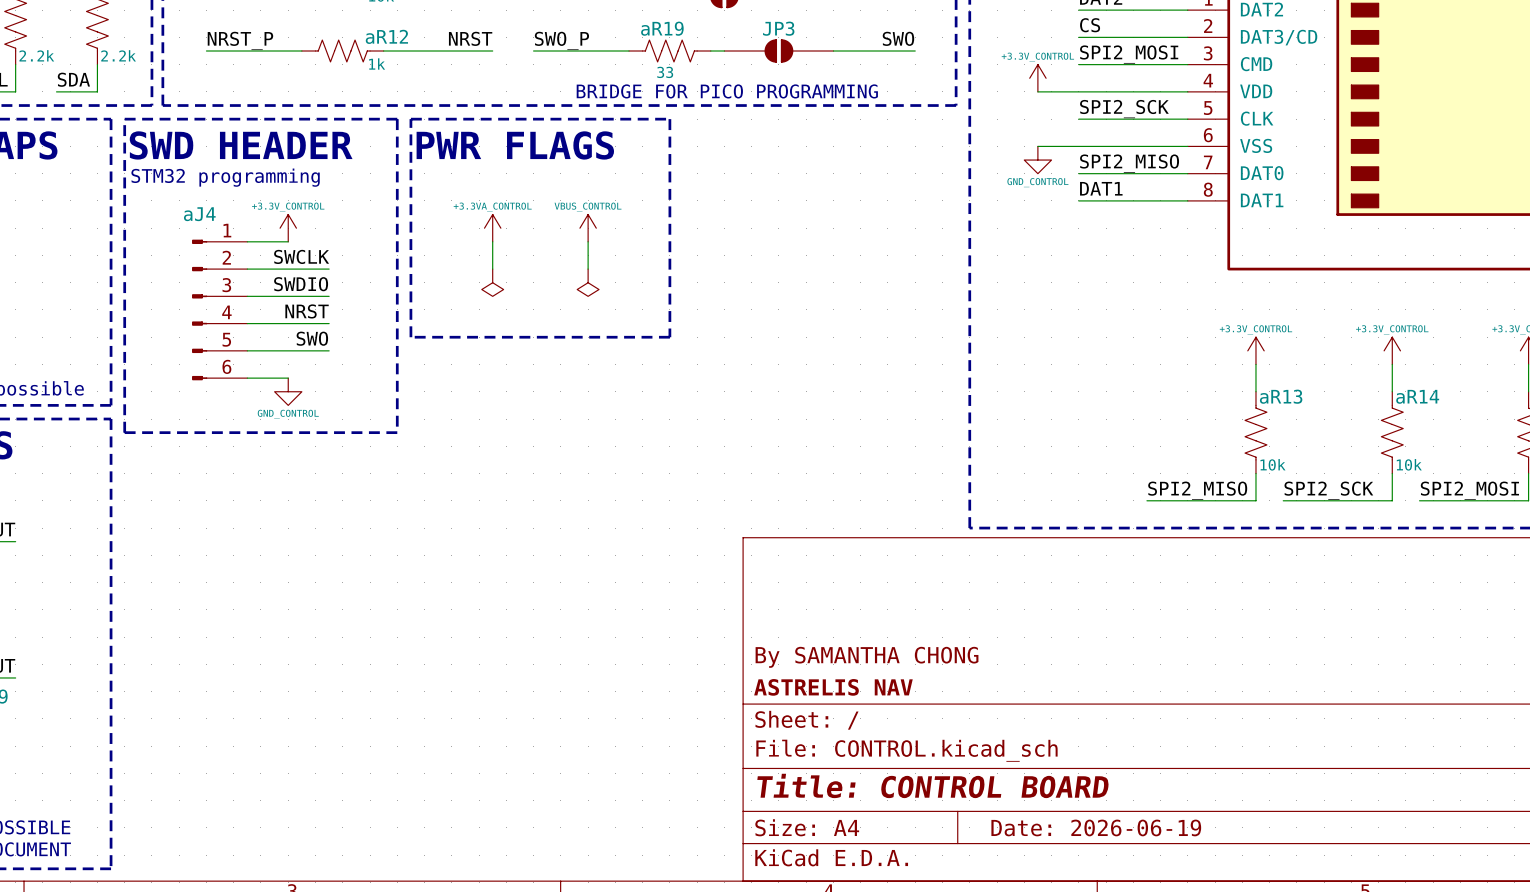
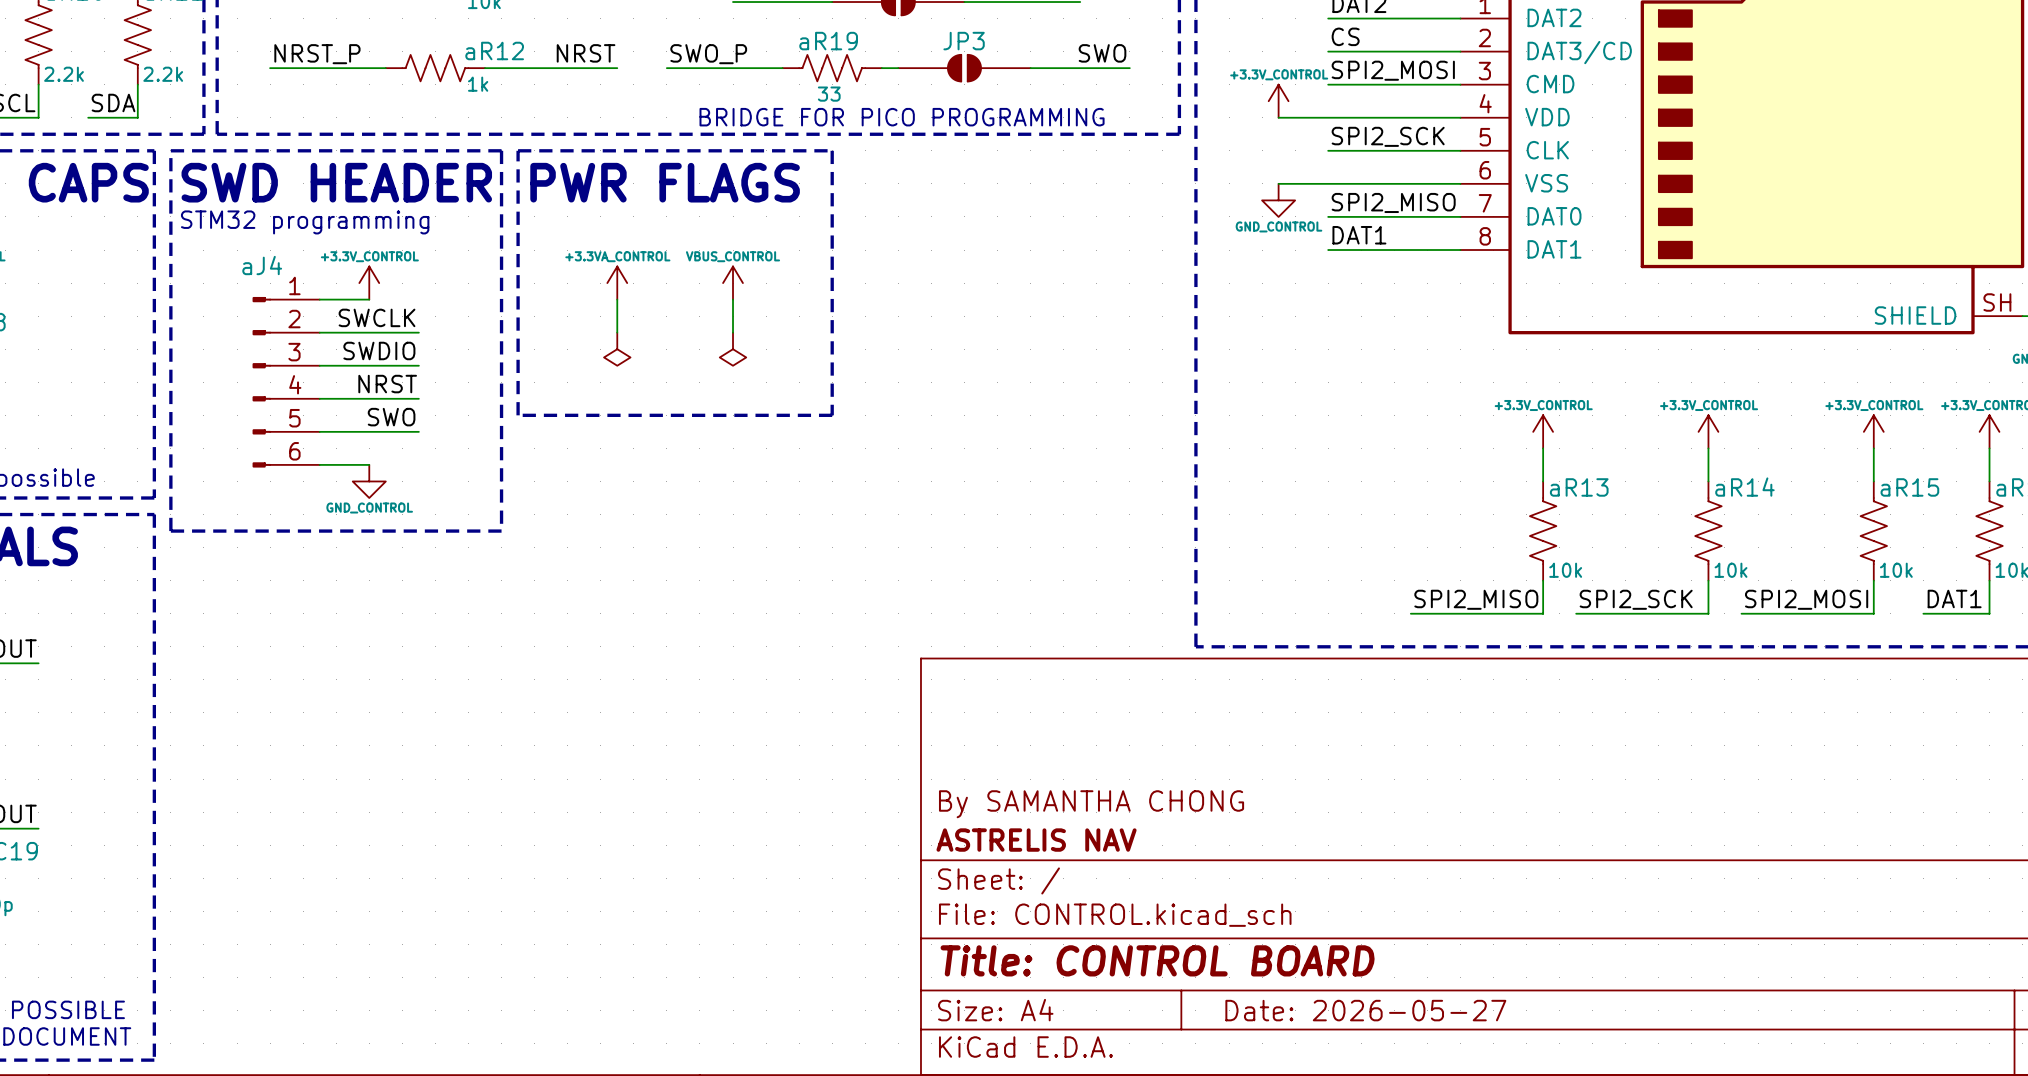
title block: Date: 2026-06-19 (1096, 827) -> Date: 2026-05-27 (1365, 1010)

